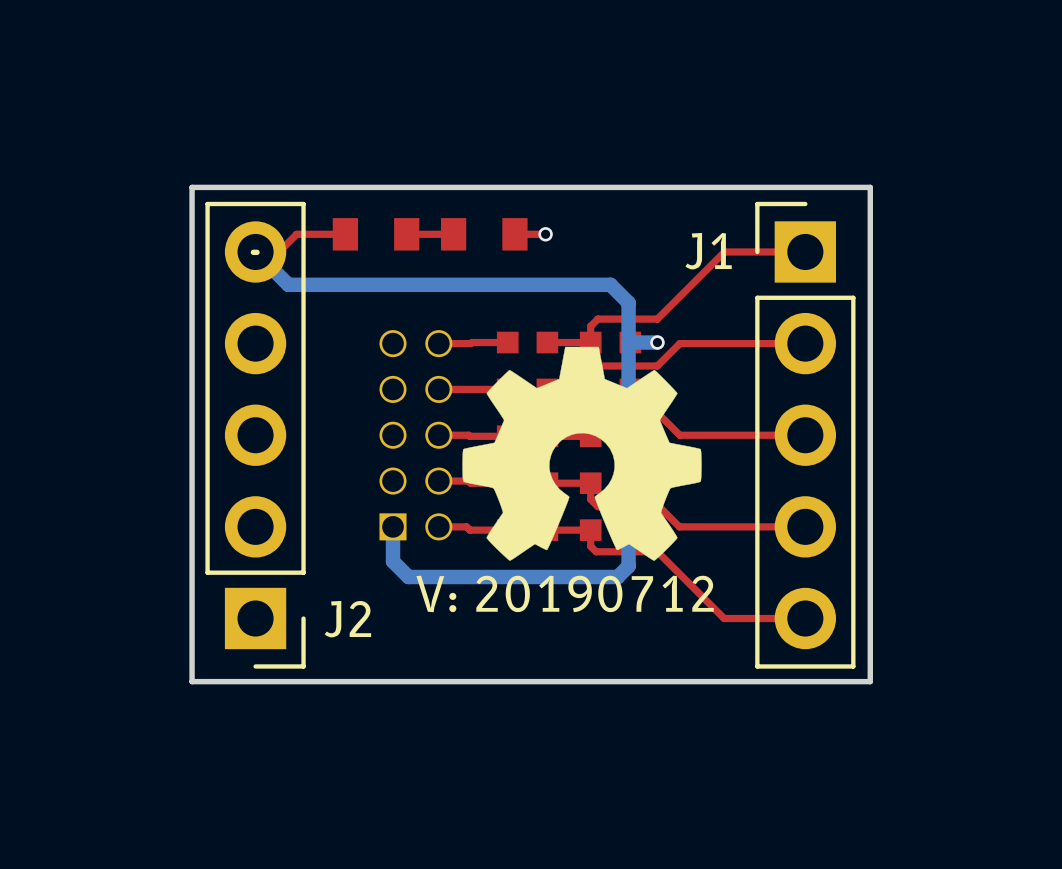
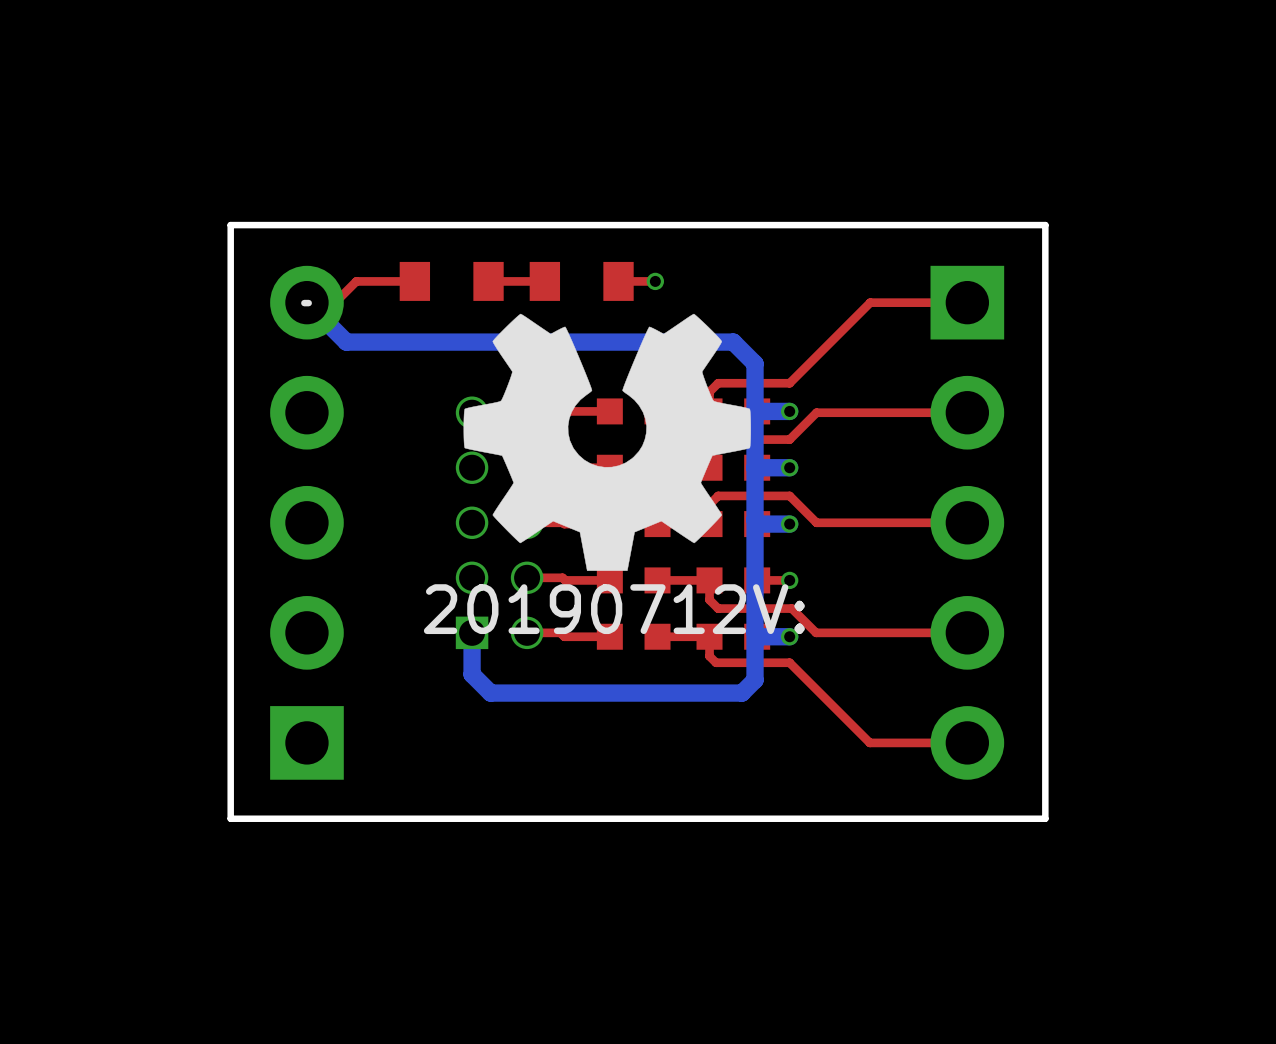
drawing: none -> [463, 313, 751, 571]
drawing: [462, 346, 702, 561] -> none
J2 side: bottom (255, 435) -> top (306, 522)
J1 side: bottom (805, 435) -> top (967, 522)

